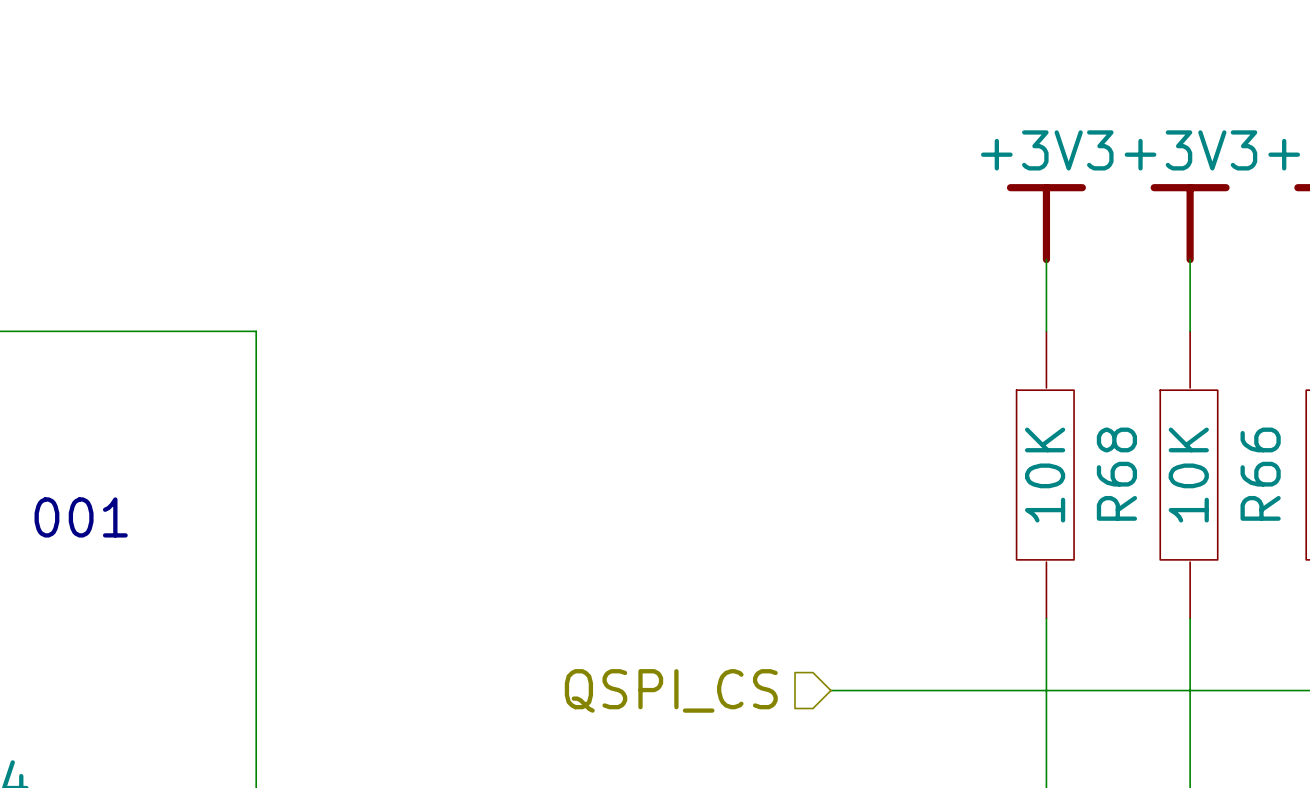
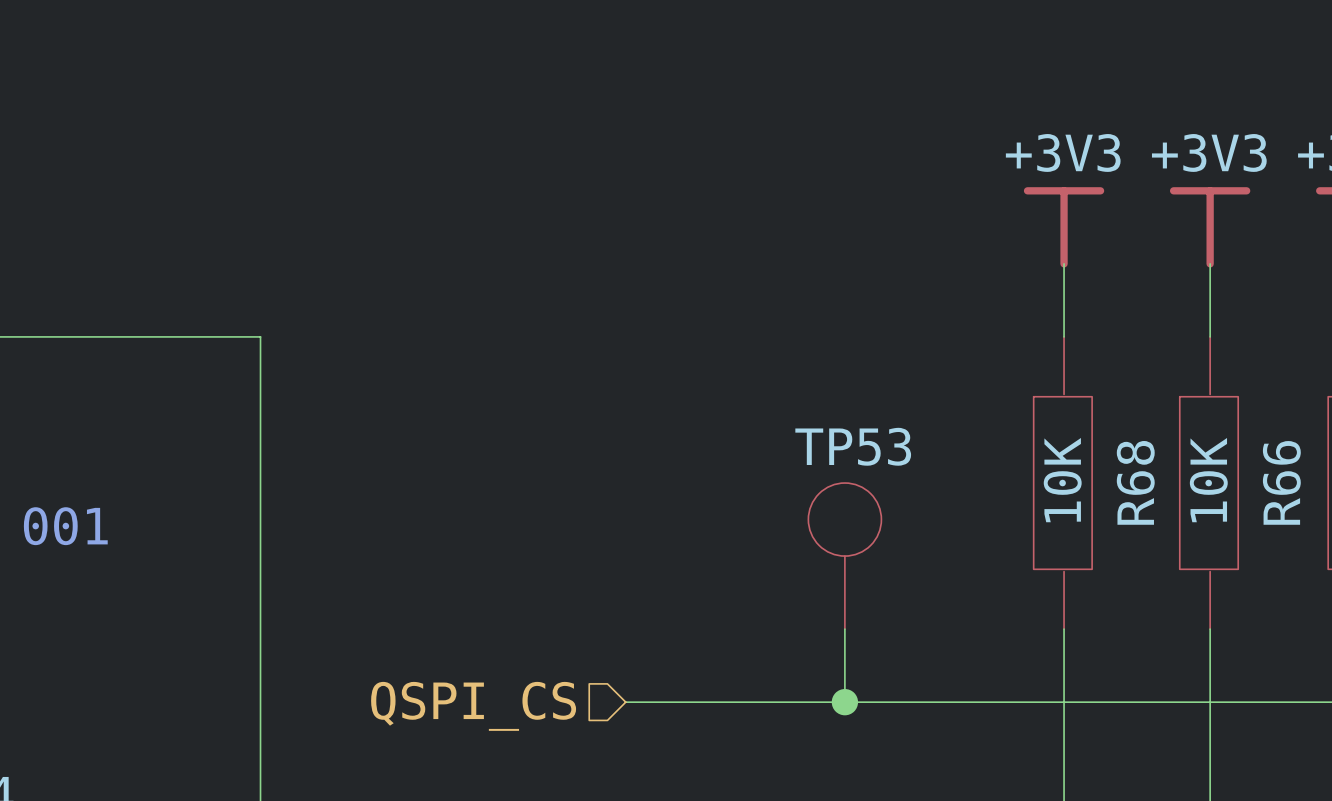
TP53: none -> (844, 556)
wire: none -> (844, 629) (844, 702) (625, 702)
hierarchical label position: QSPI_CS (671, 690) -> QSPI_CS (473, 706)
junction: none -> (844, 702)

